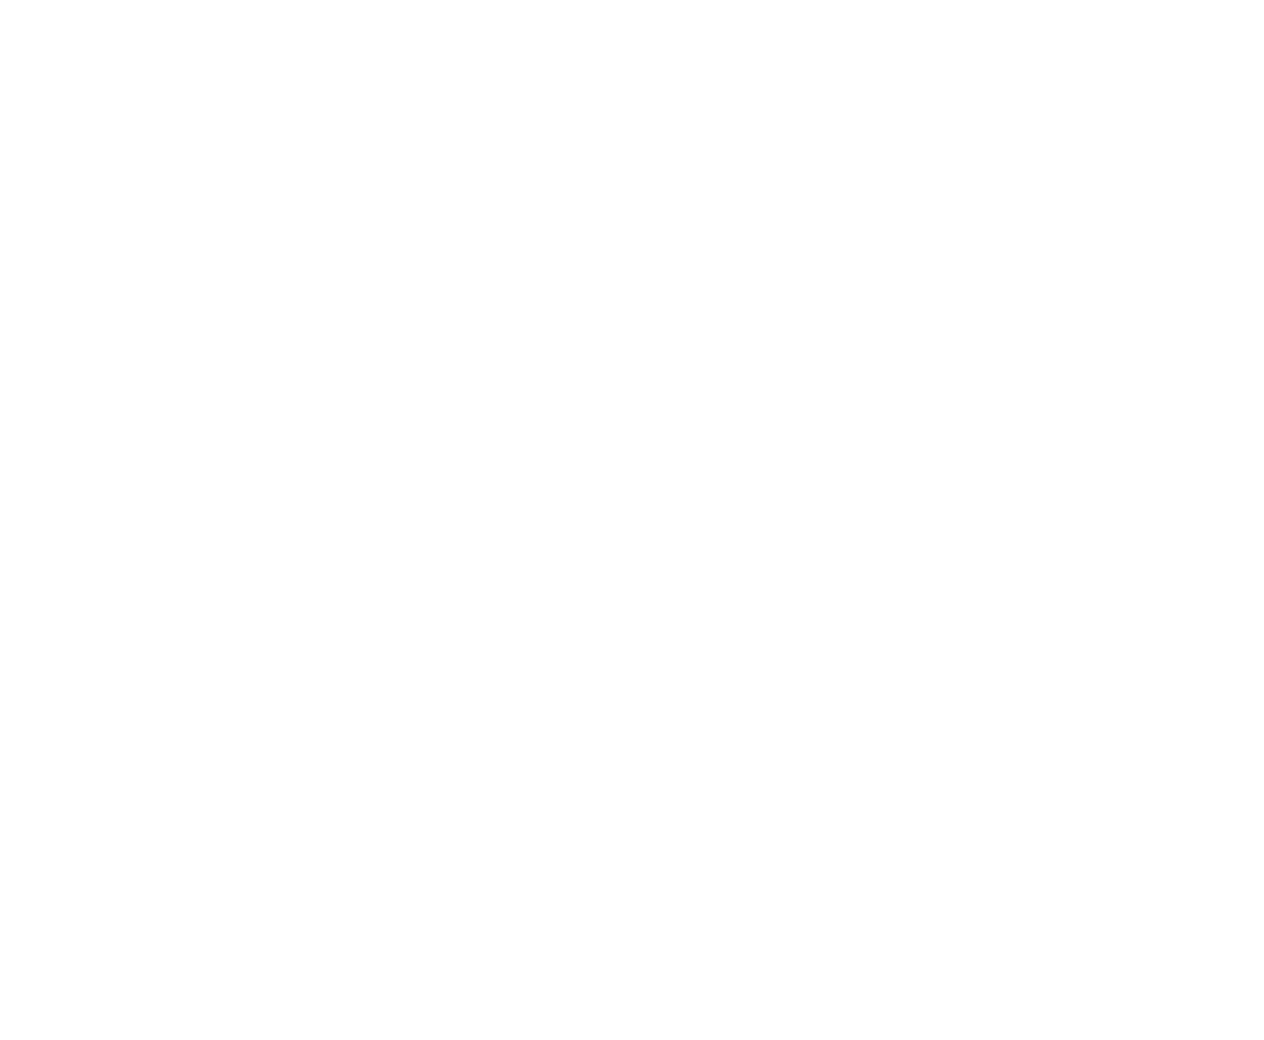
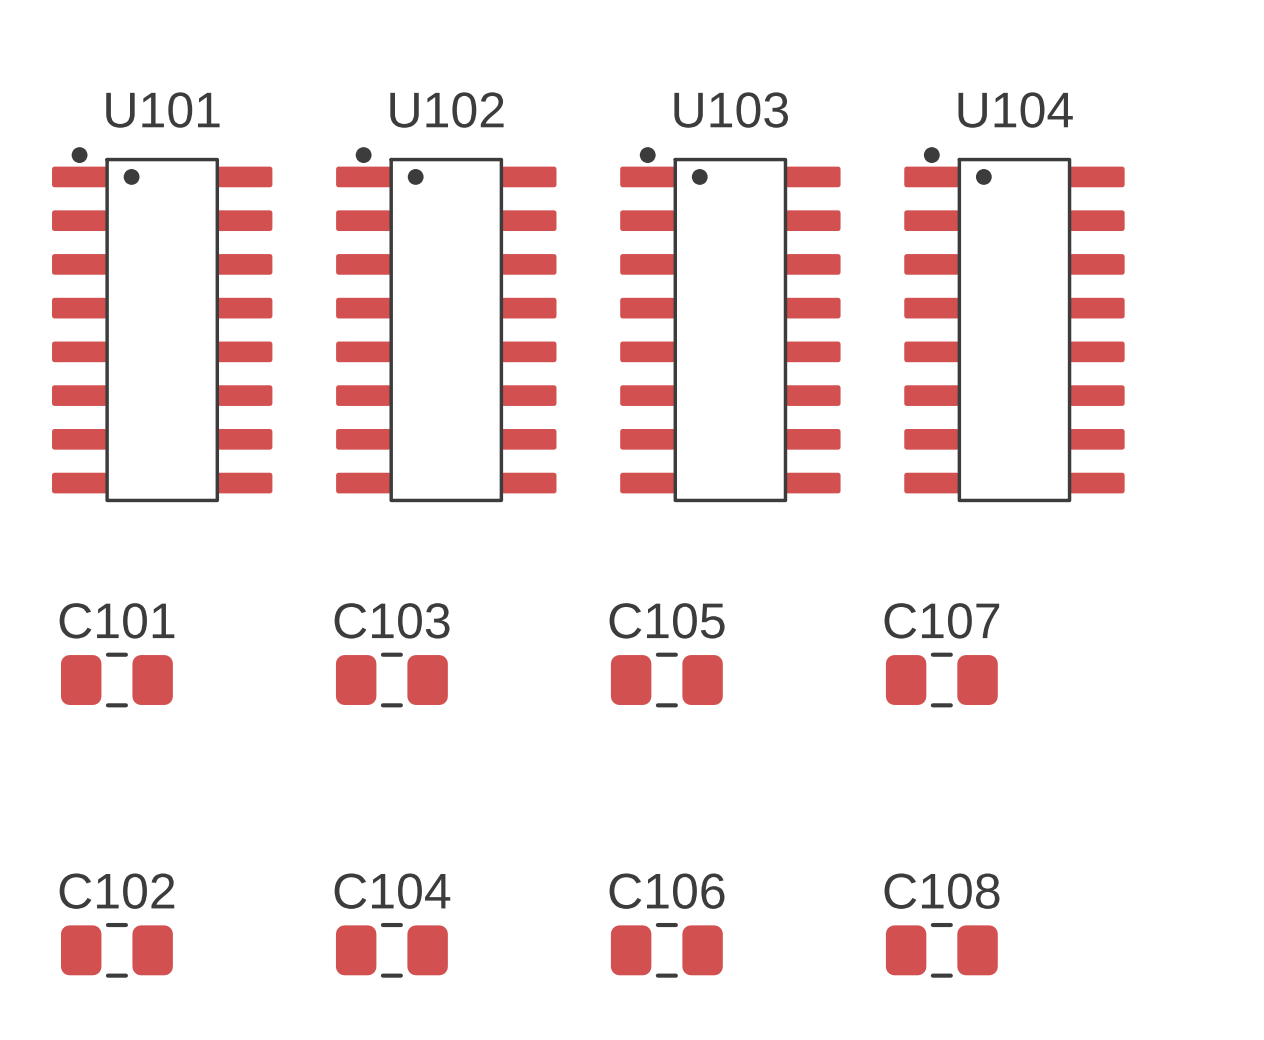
U101: none -> (162, 324)
U102: none -> (446, 324)
U103: none -> (730, 324)
U104: none -> (1014, 324)
C101: none -> (116, 680)
C103: none -> (391, 680)
C105: none -> (666, 680)
C107: none -> (941, 680)
C102: none -> (116, 950)
C104: none -> (391, 950)
C106: none -> (666, 950)
C108: none -> (941, 950)

